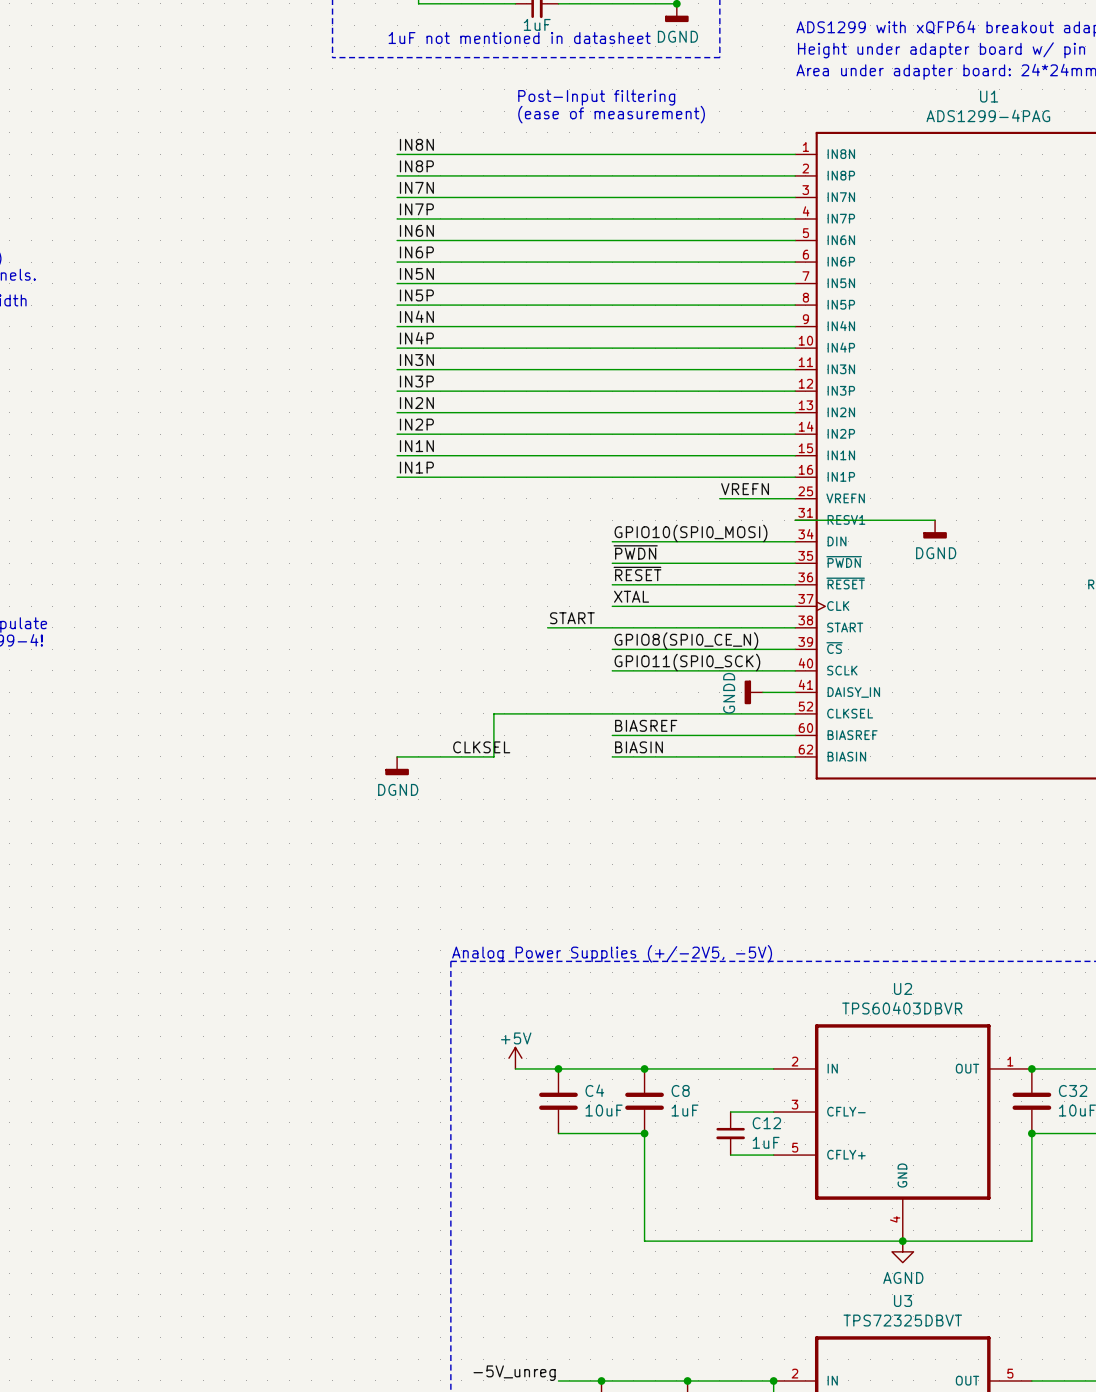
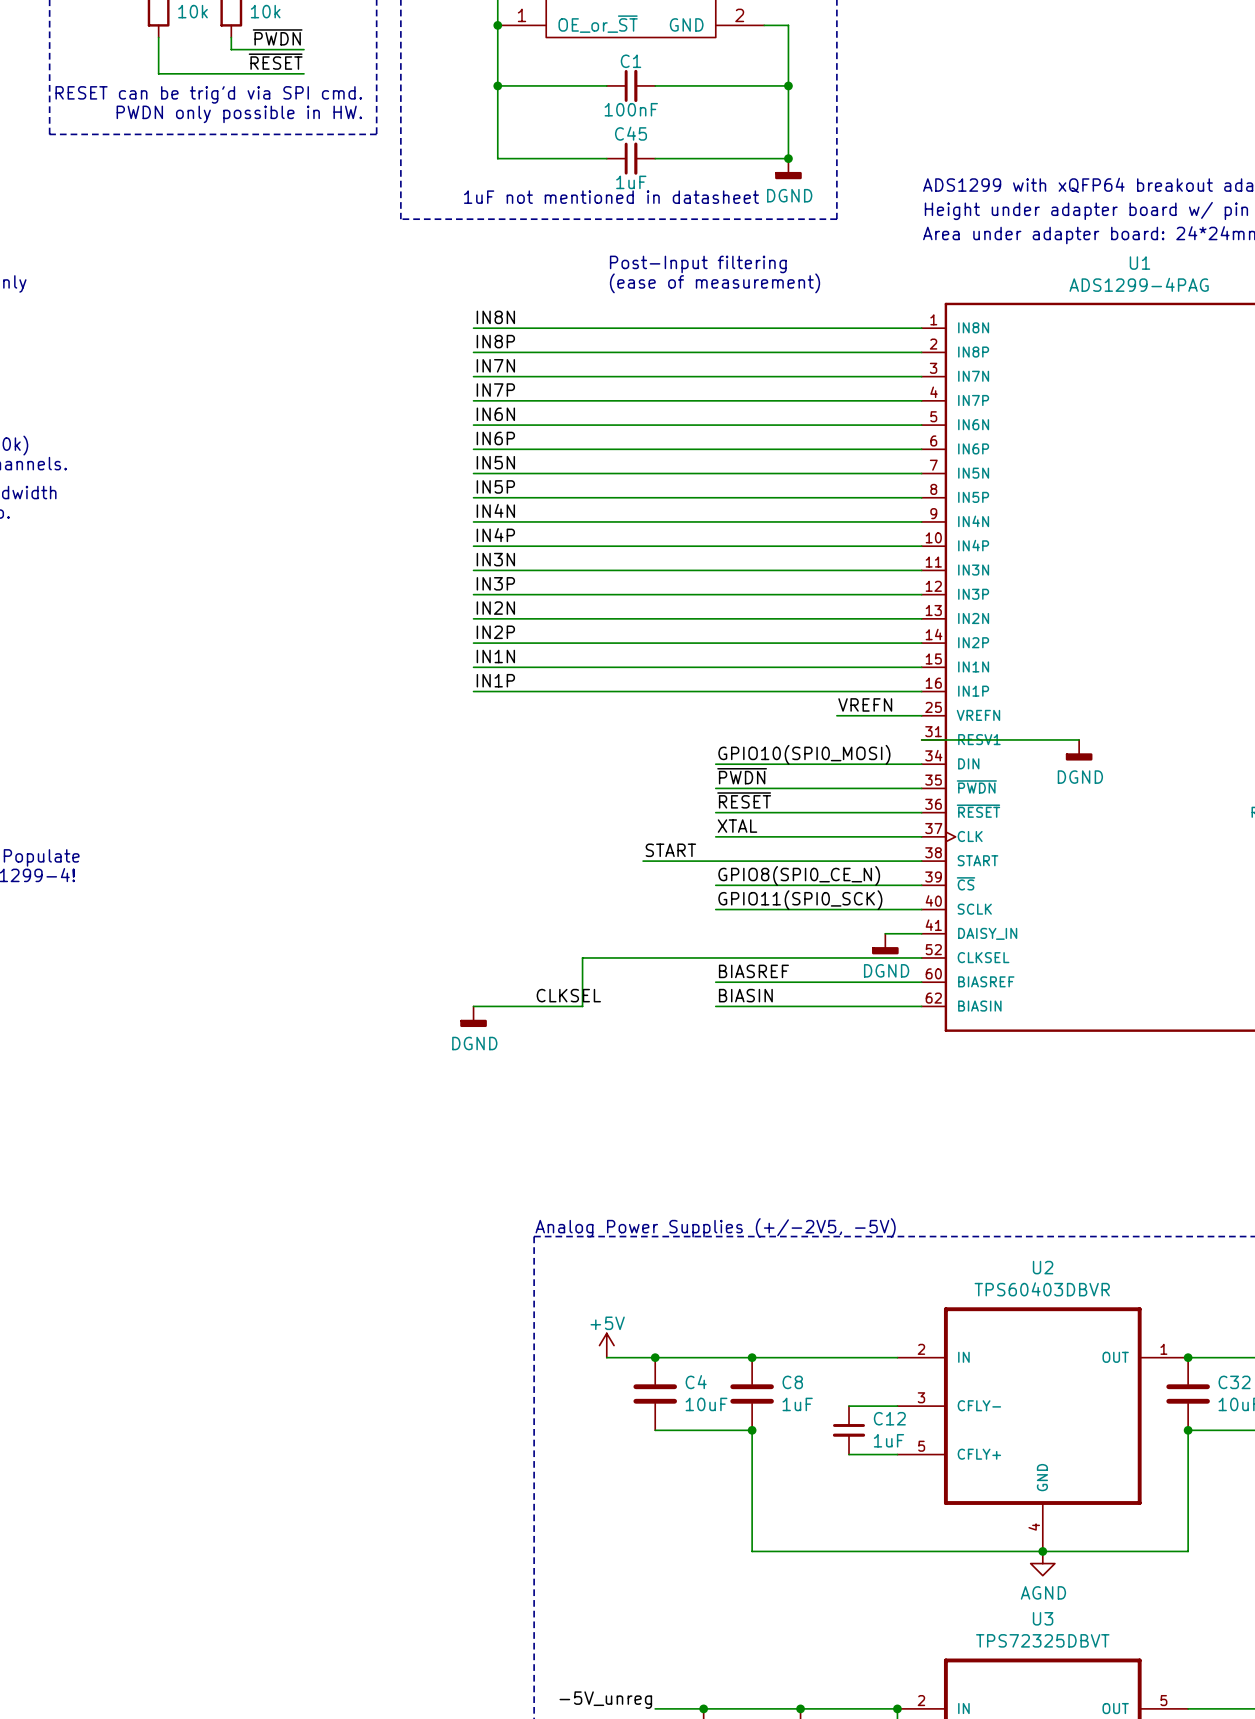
power symbol: GNDD (753, 692) -> none
power symbol: none -> DGND (885, 944)

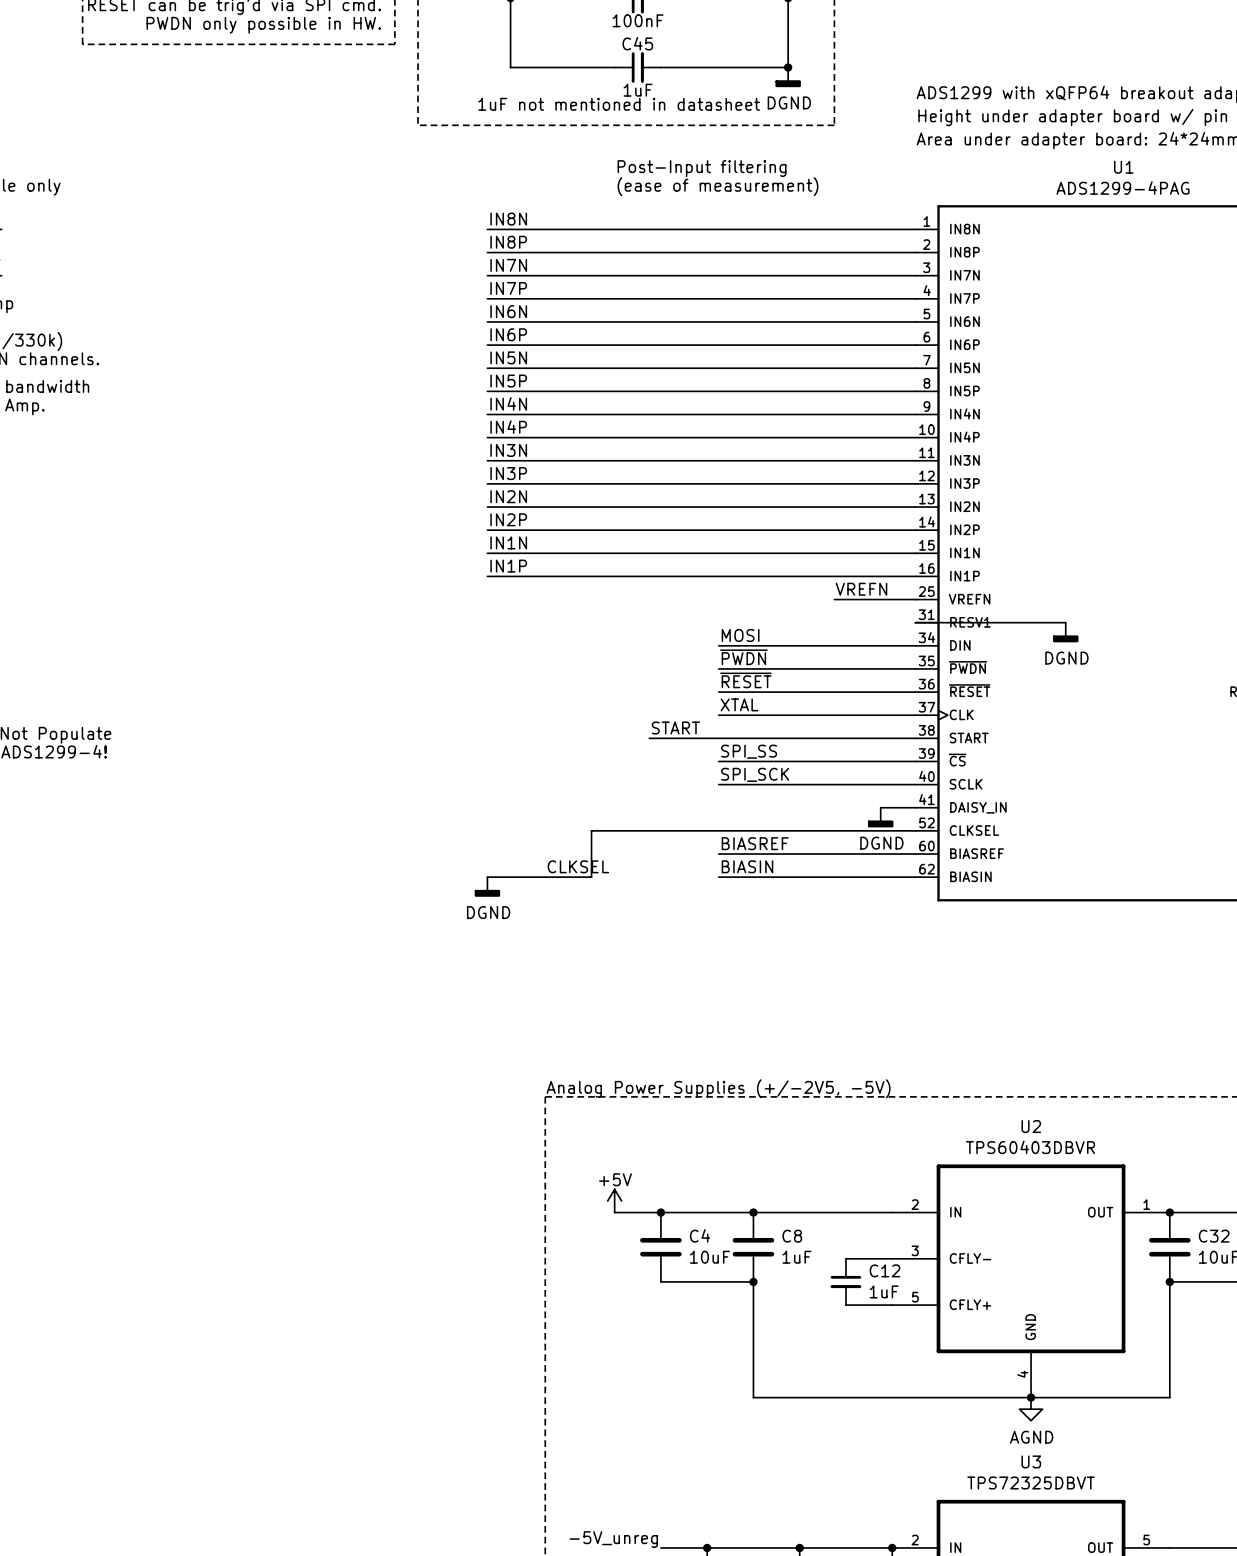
label: GPIO10(SPI0_MOSI) (804, 754) -> MOSI (740, 635)
label: GPIO8(SPI0_CE_N) (799, 875) -> SPI_SS (749, 751)
label: GPIO11(SPI0_SCK) (800, 900) -> SPI_SCK (755, 774)

